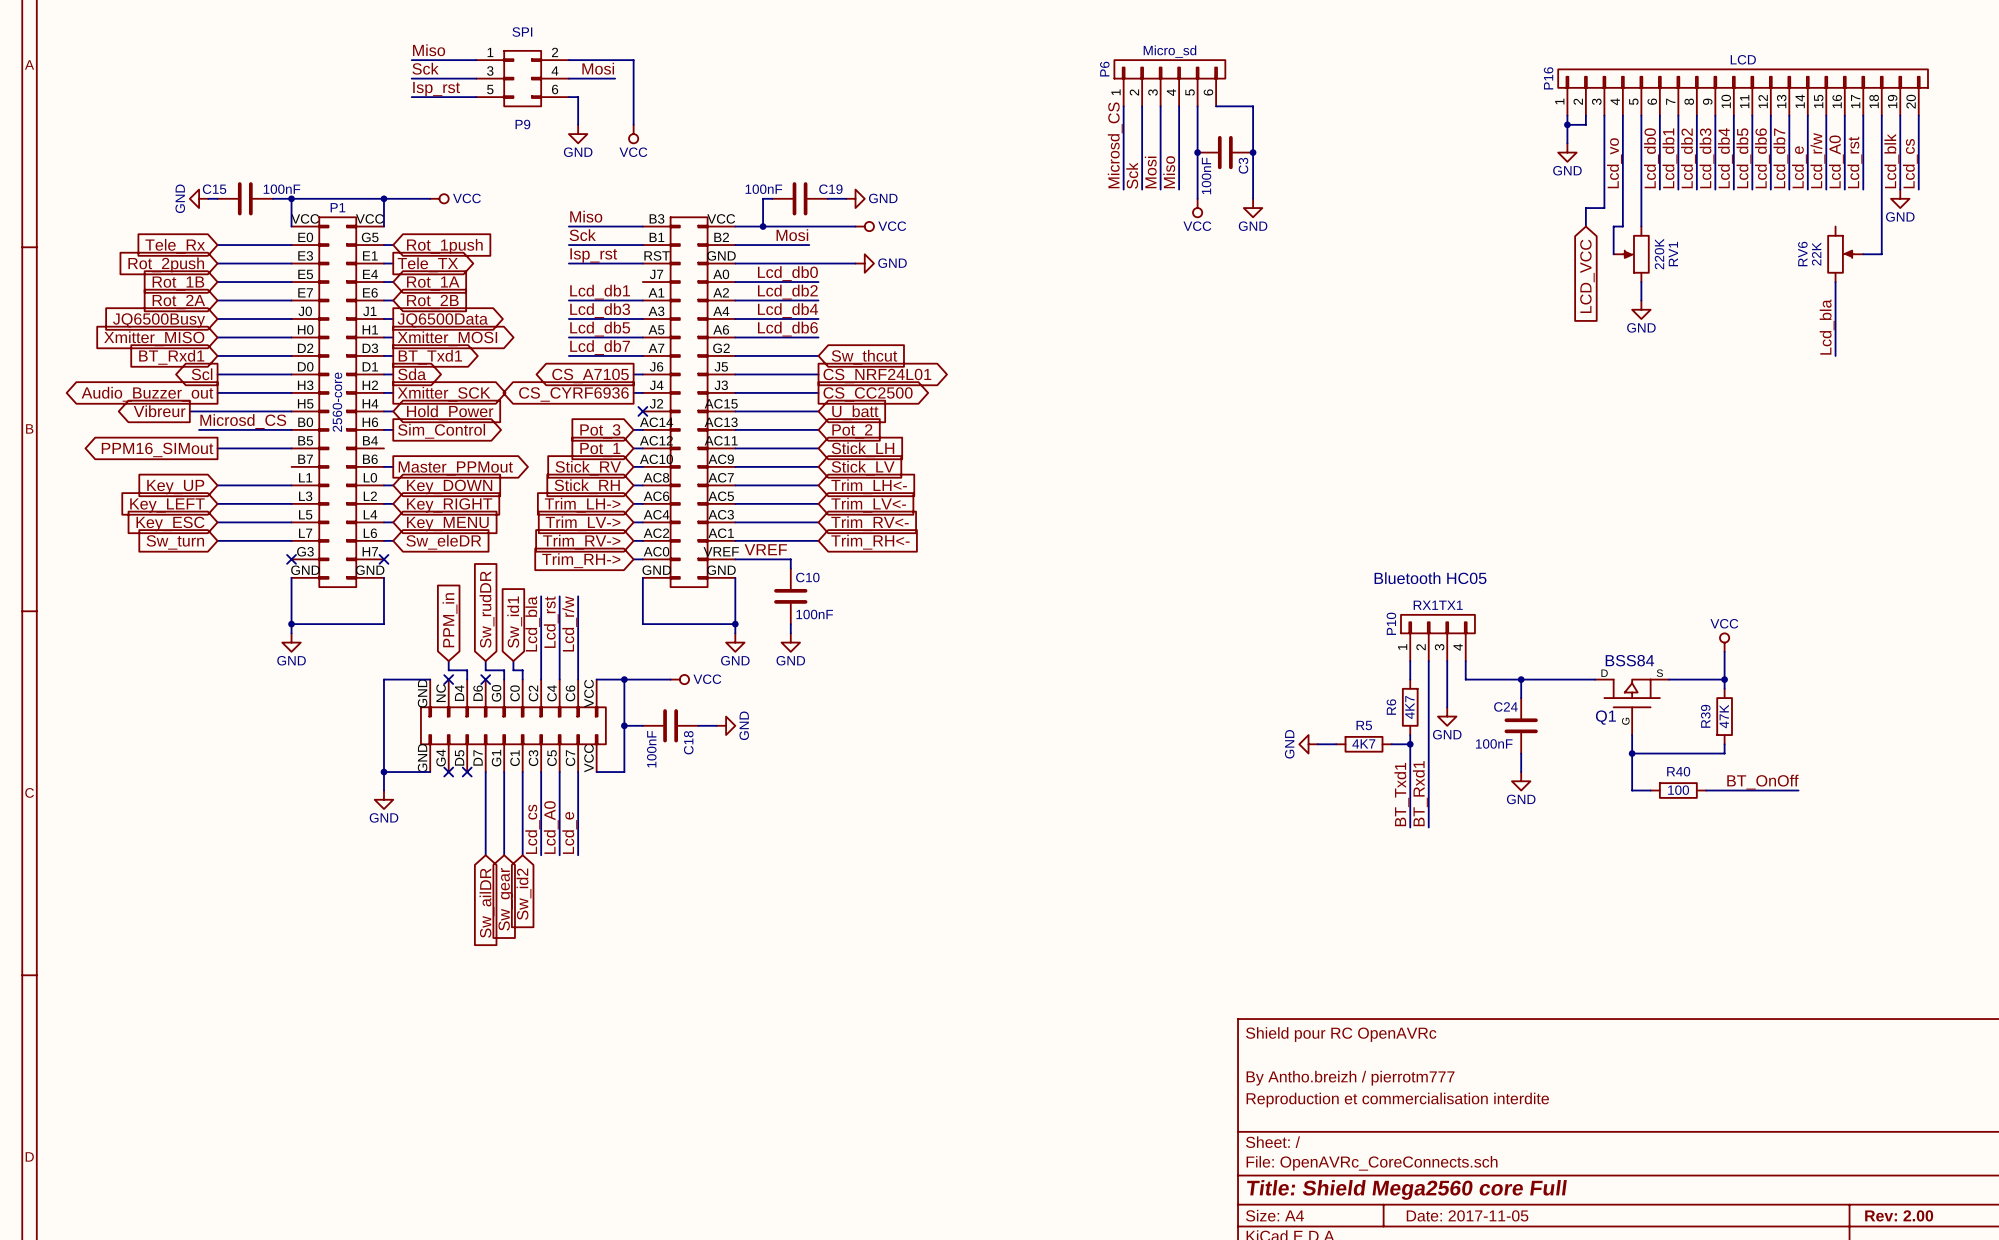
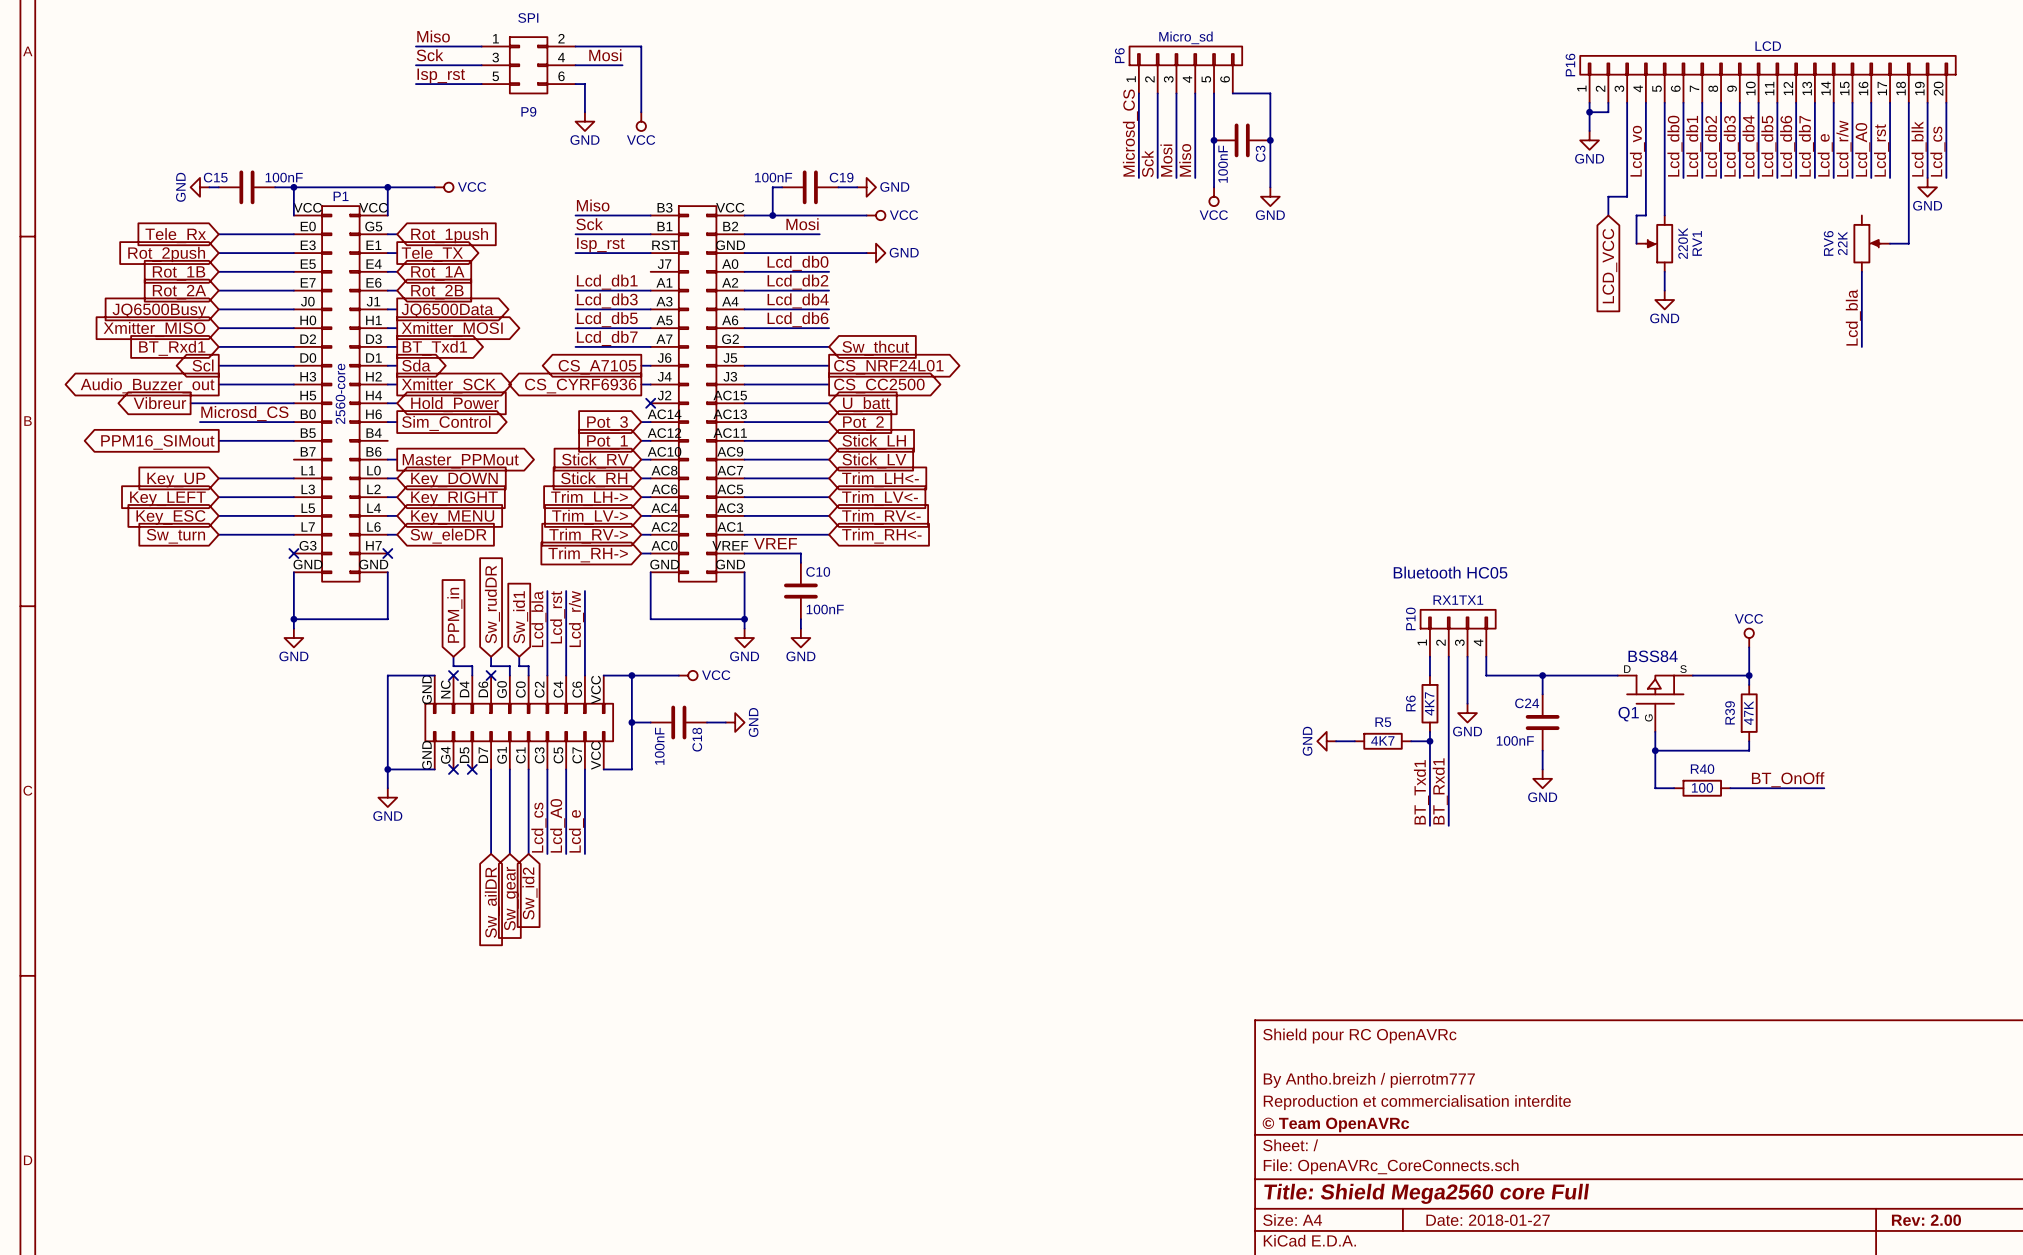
title block: none -> © Team OpenAVRc (1335, 1124)
title block: Date: 2017-11-05 (1467, 1215) -> Date: 2018-01-27 (1488, 1220)

